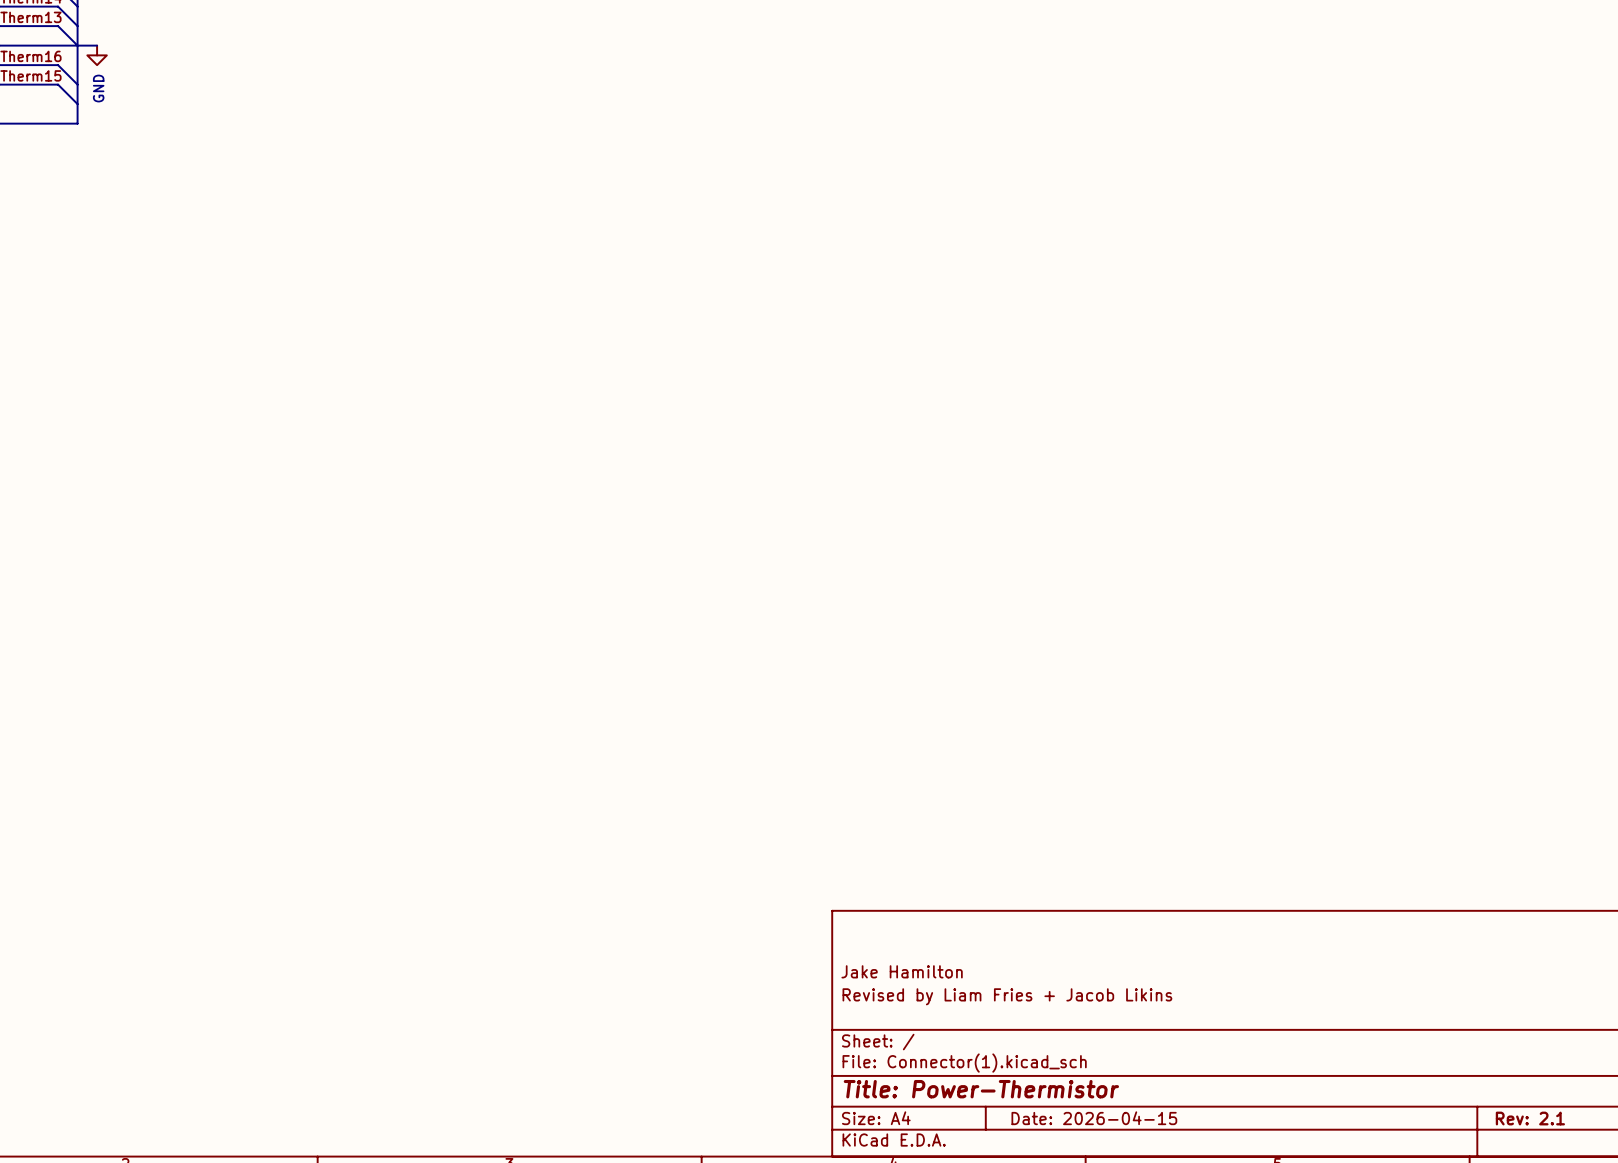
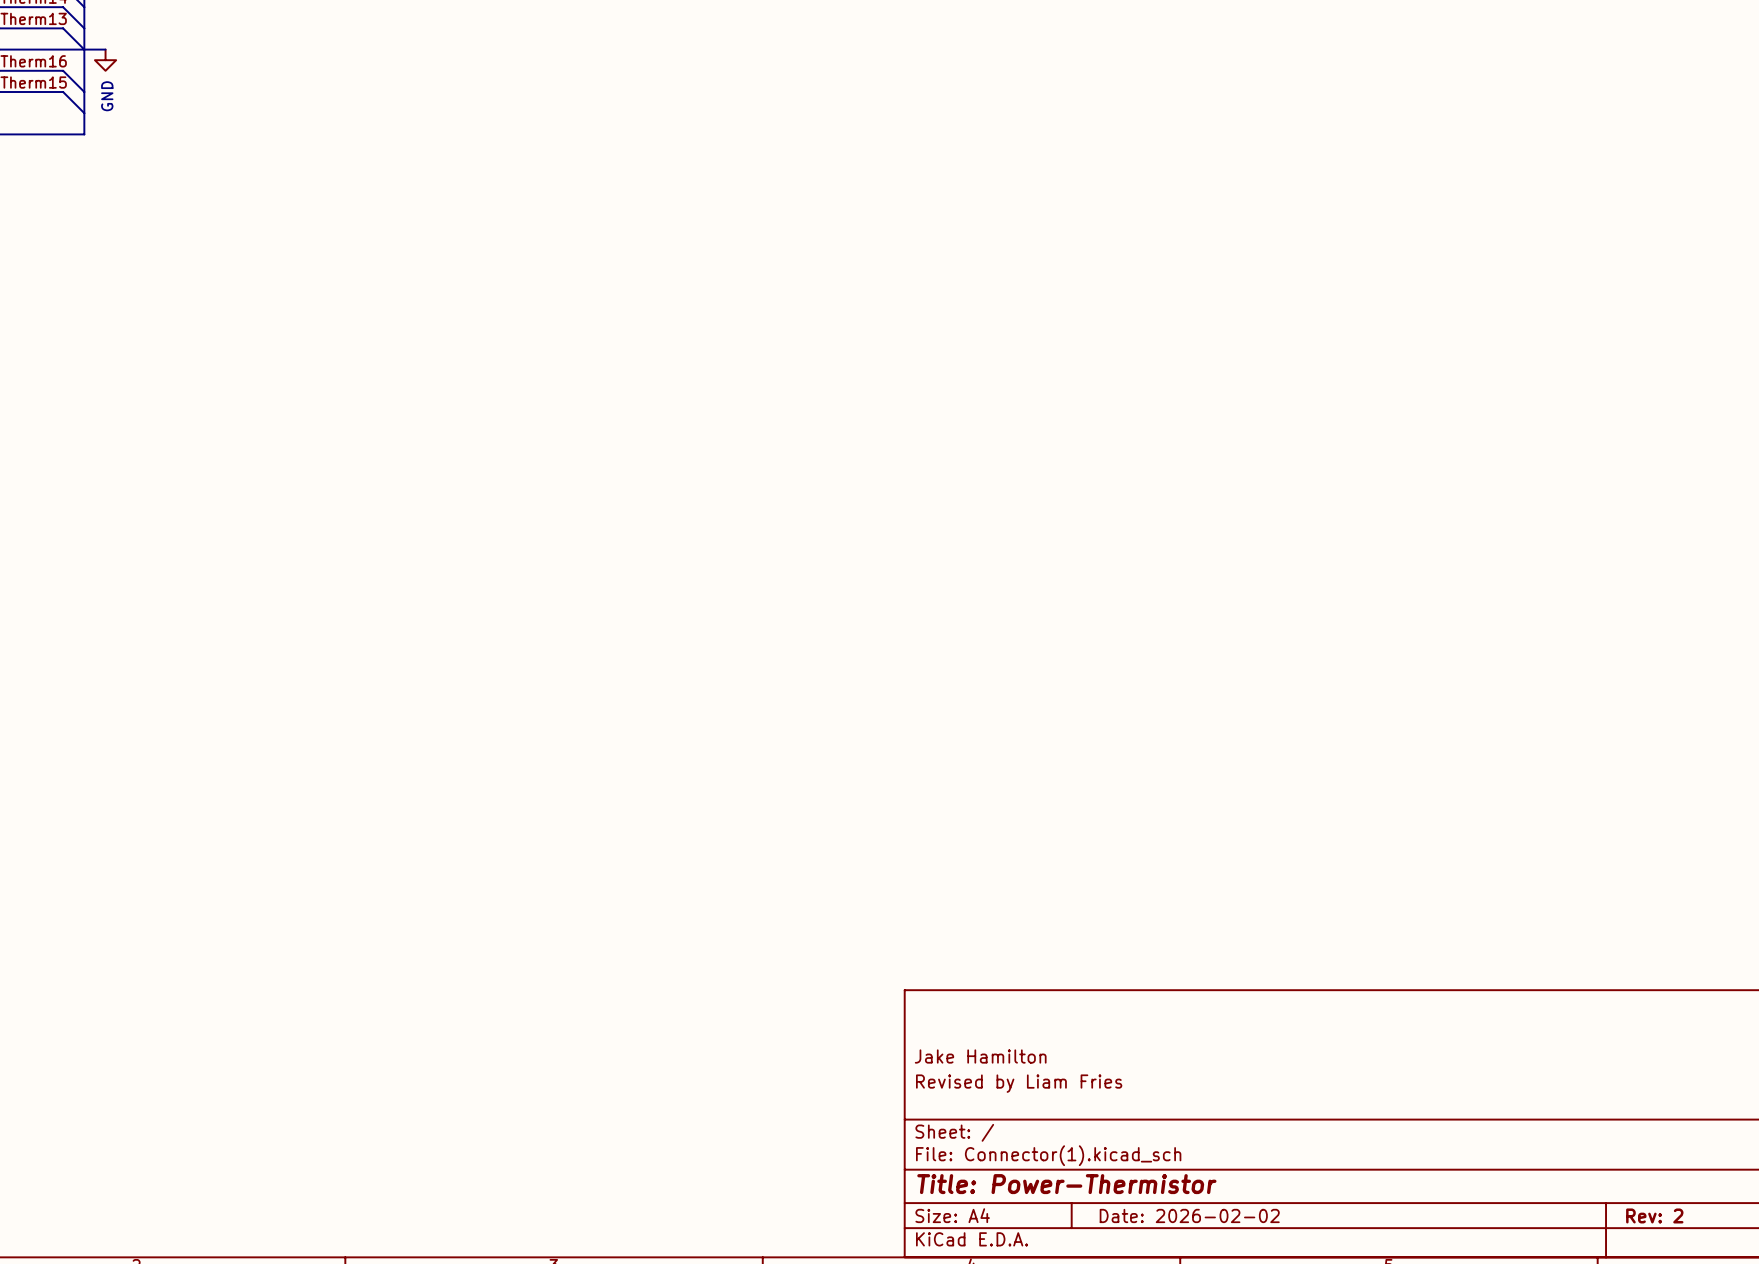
title block: Revised by Liam Fries + Jacob Likins (1007, 996) -> Revised by Liam Fries (1019, 1083)
title block: Date: 2026-04-15 (1094, 1118) -> Date: 2026-02-02 (1189, 1215)
title block: Rev: 2.1 (1530, 1118) -> Rev: 2 (1654, 1215)

